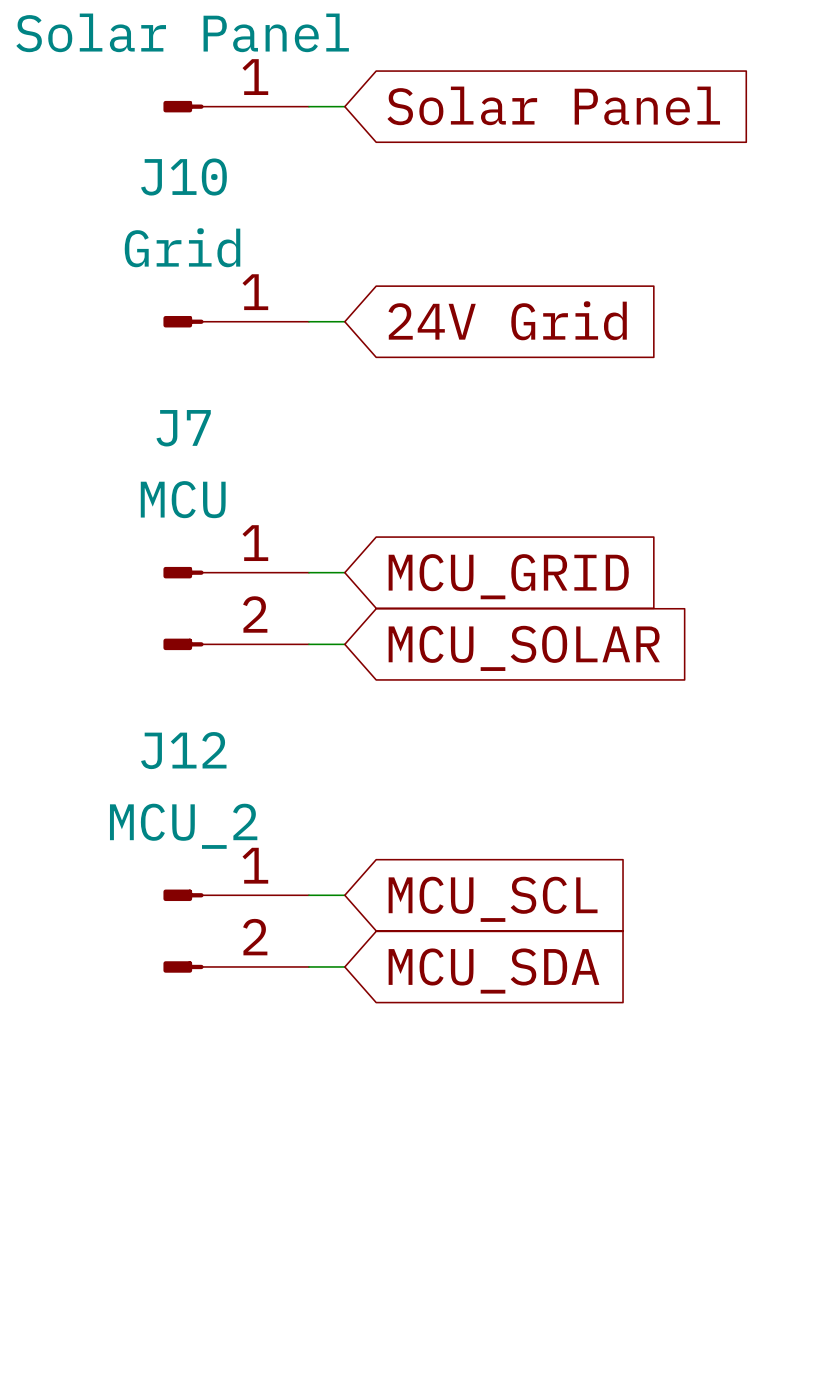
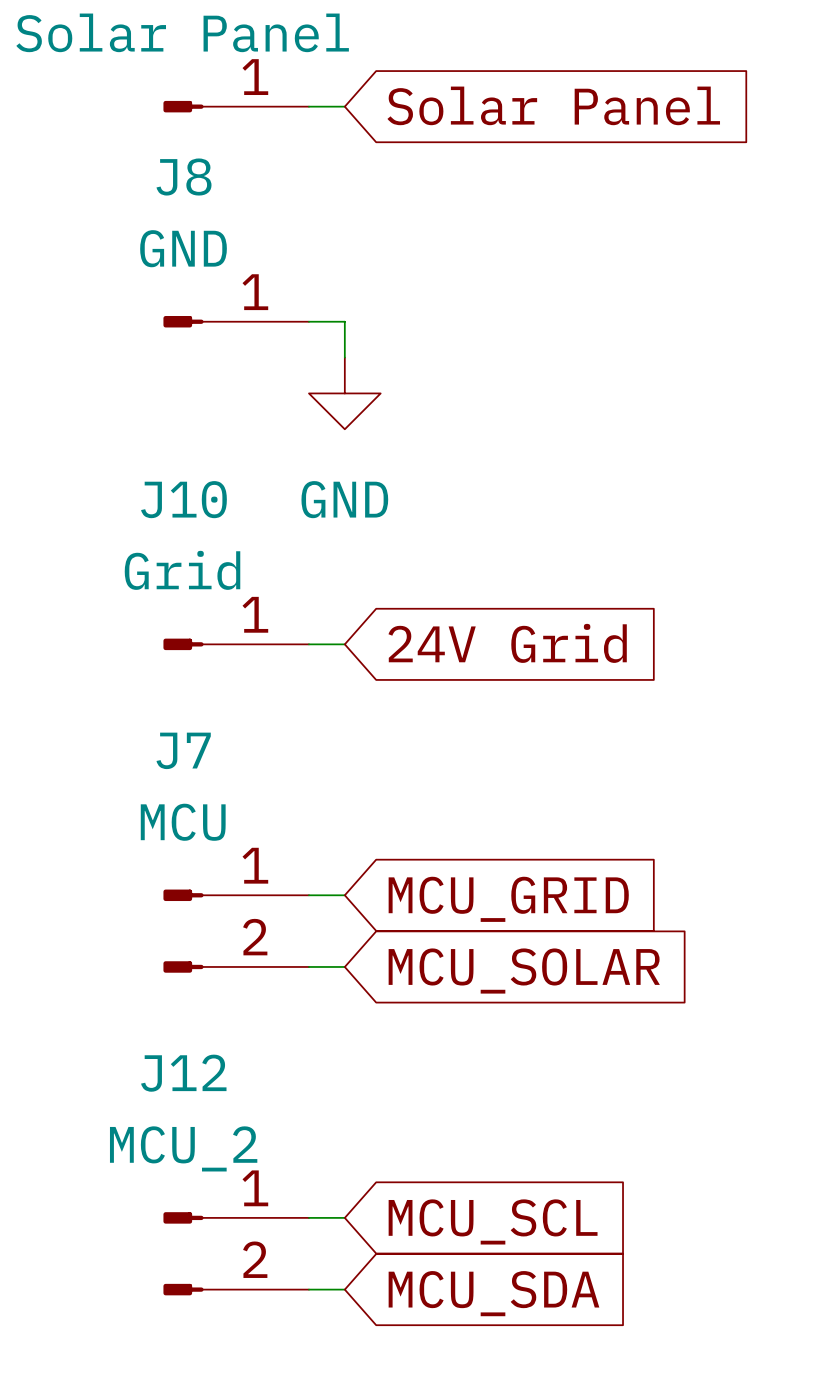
J10 name: J10 (183, 177) -> J8 (184, 177)
J10 value: Grid (182, 247) -> GND (183, 248)
global label: 24V Grid (507, 320) -> none
wire: none -> (344, 321) (344, 357)
power symbol: none -> GND (344, 393)
wire: (308, 572) (344, 572) -> (308, 1217) (344, 1217)
global label: MCU_GRID (508, 576) -> none
J7: MCU (236, 608) -> none
J10: none -> Grid (236, 644)
global label: MCU_SOLAR (524, 648) -> 24V Grid (507, 643)
J12 name: J12 (183, 750) -> J7 (183, 750)
J12 value: MCU_2 (183, 826) -> MCU (183, 822)
global label: MCU_SCL (493, 899) -> MCU_GRID (508, 899)
global label: MCU_SDA (493, 971) -> MCU_SOLAR (524, 971)
global label: none -> MCU_SCL (493, 1221)
J12: none -> MCU_2 (236, 1253)
wire: none -> (308, 1289) (344, 1289)
global label: none -> MCU_SDA (493, 1293)

